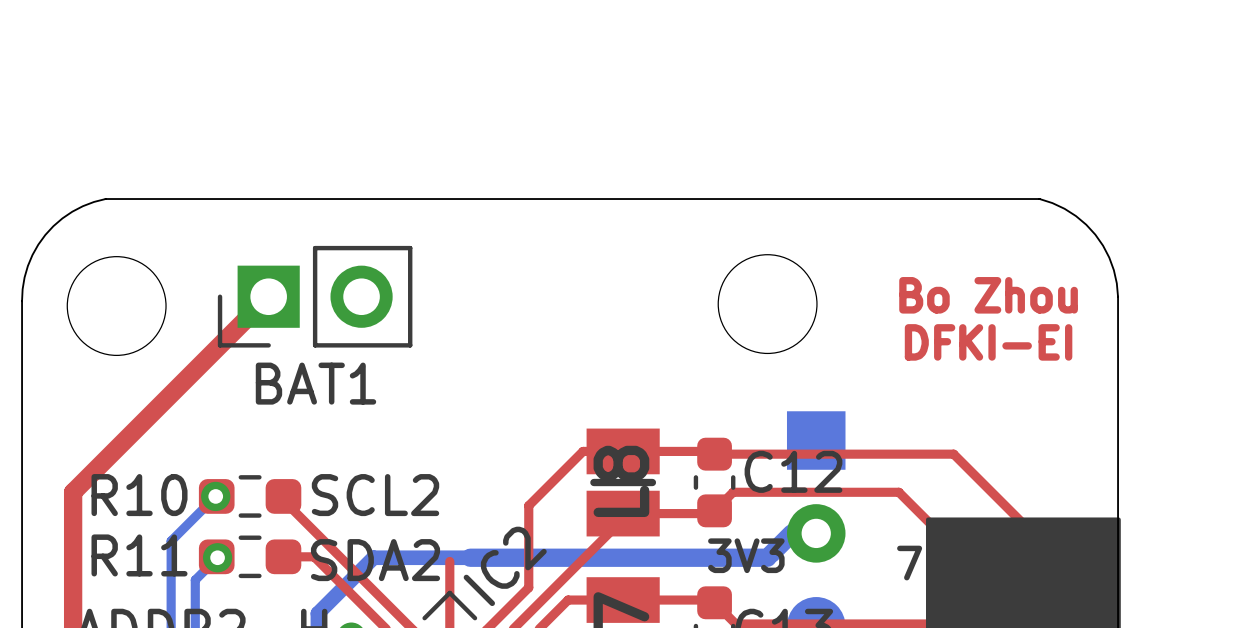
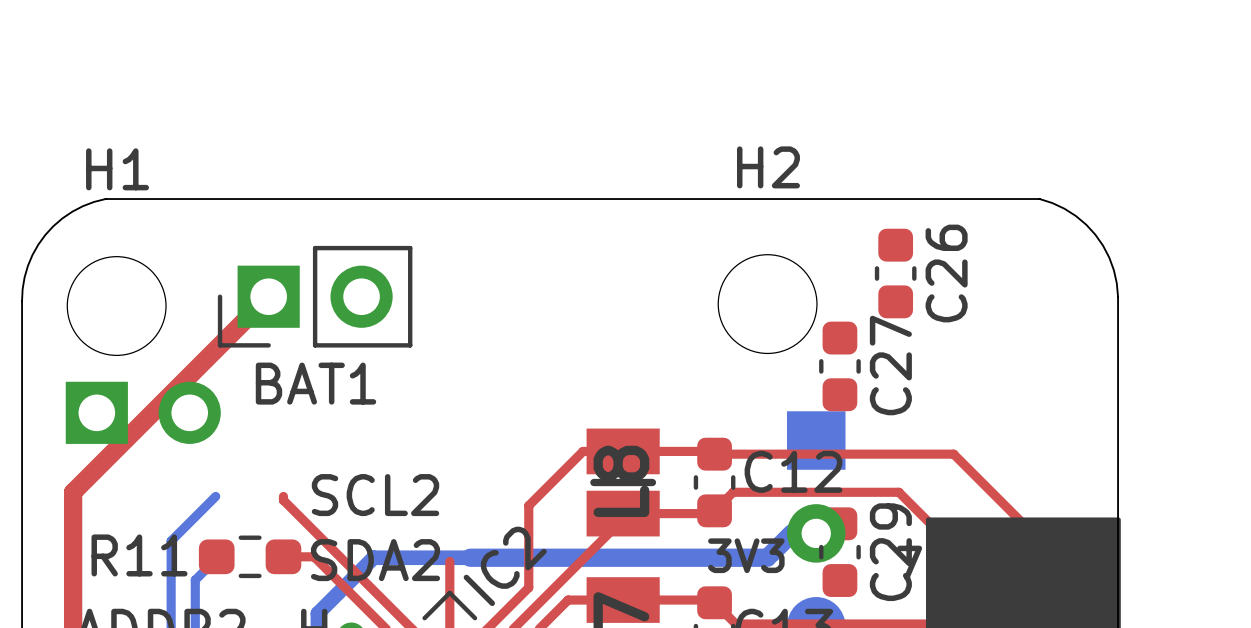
H2 name: none -> H2 (768, 167)
H1 name: none -> H1 (117, 169)
C26: none -> (895, 273)
text: Bo Zhou (988, 295) -> none
text: DFKI-EI (988, 342) -> none
C27: none -> (839, 366)
part: none -> (143, 412)
via: (215, 496) -> none
R10: (250, 496) -> none
C29: none -> (839, 552)
via: (217, 557) -> none

